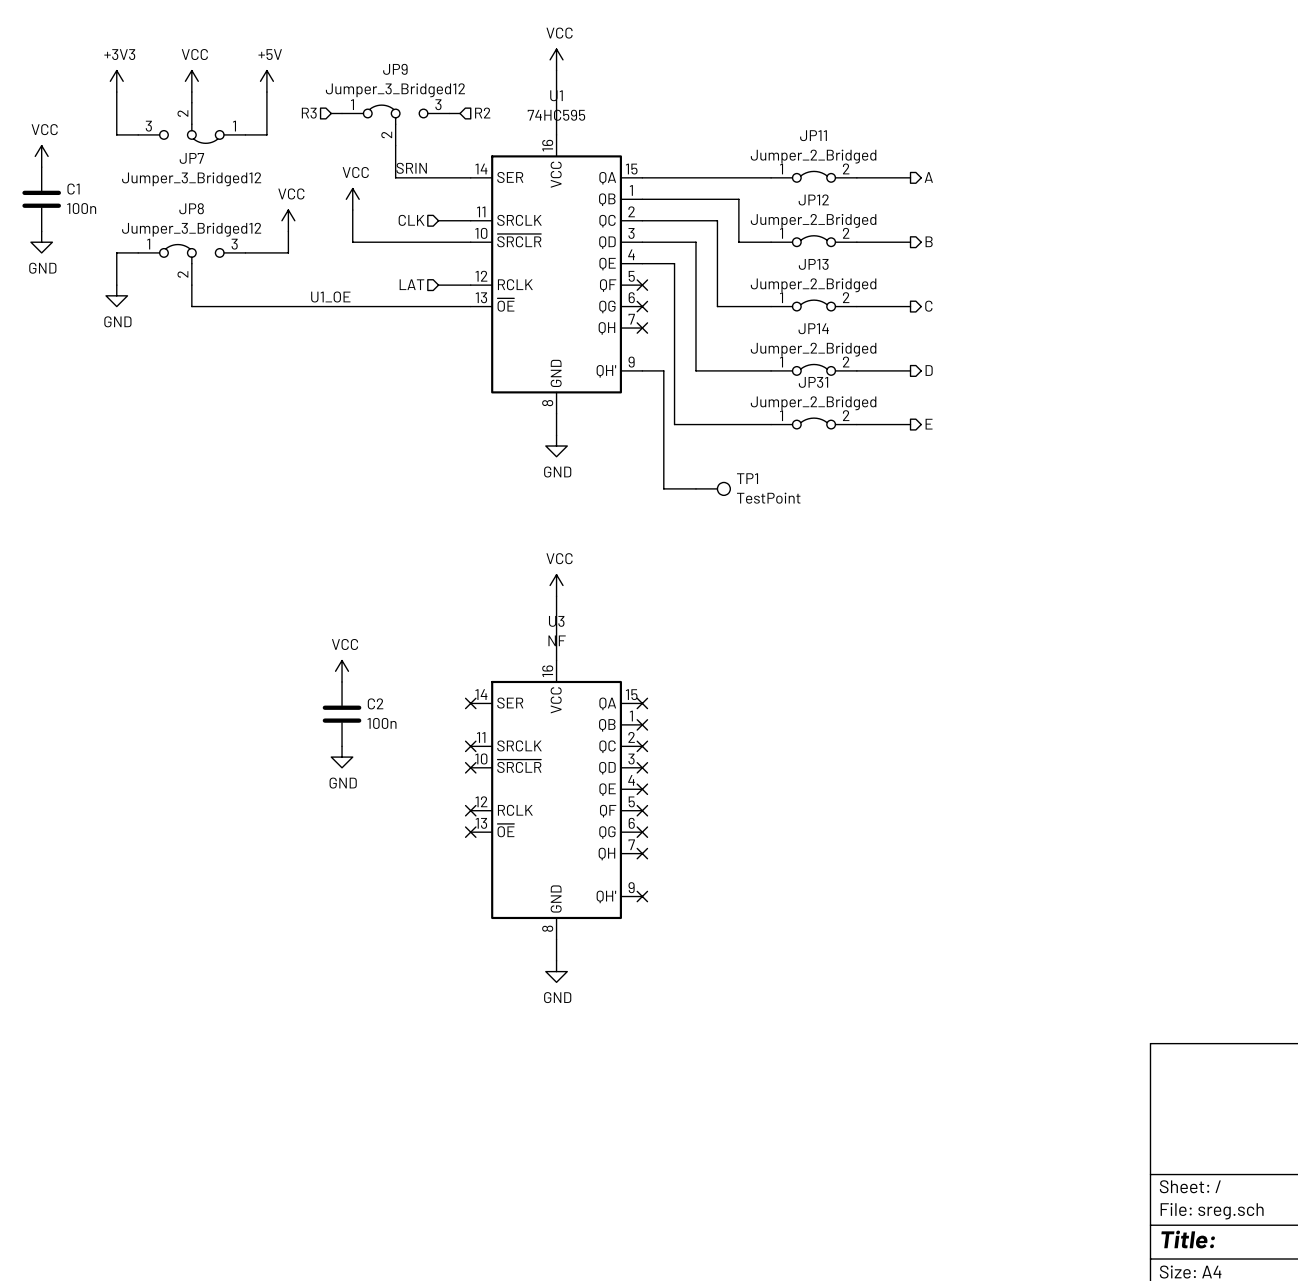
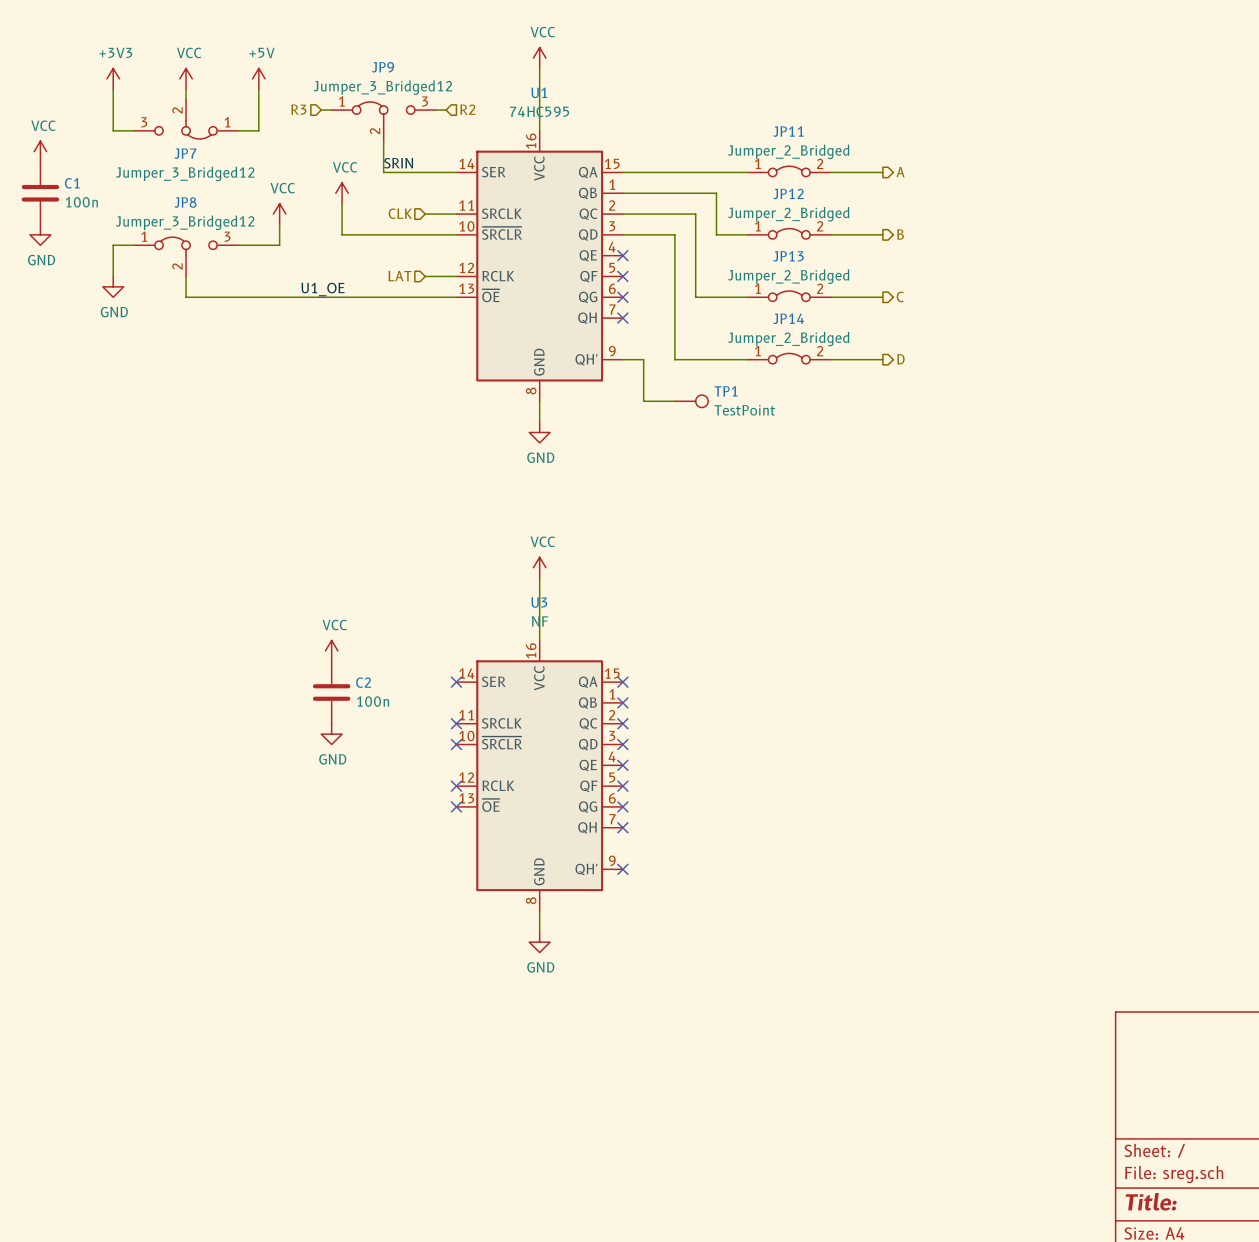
wire: (642, 263) (674, 263) (674, 424) (771, 424) -> none
no-connect mark: none -> (622, 255)
wire: (663, 413) (663, 488) (695, 488) -> (643, 401) (674, 401)
JP31: Jumper_2_Bridged (813, 423) -> none
wire: (856, 424) (910, 424) -> none
hierarchical label: E (929, 424) -> none
TP1 position: (713, 488) -> (691, 401)

